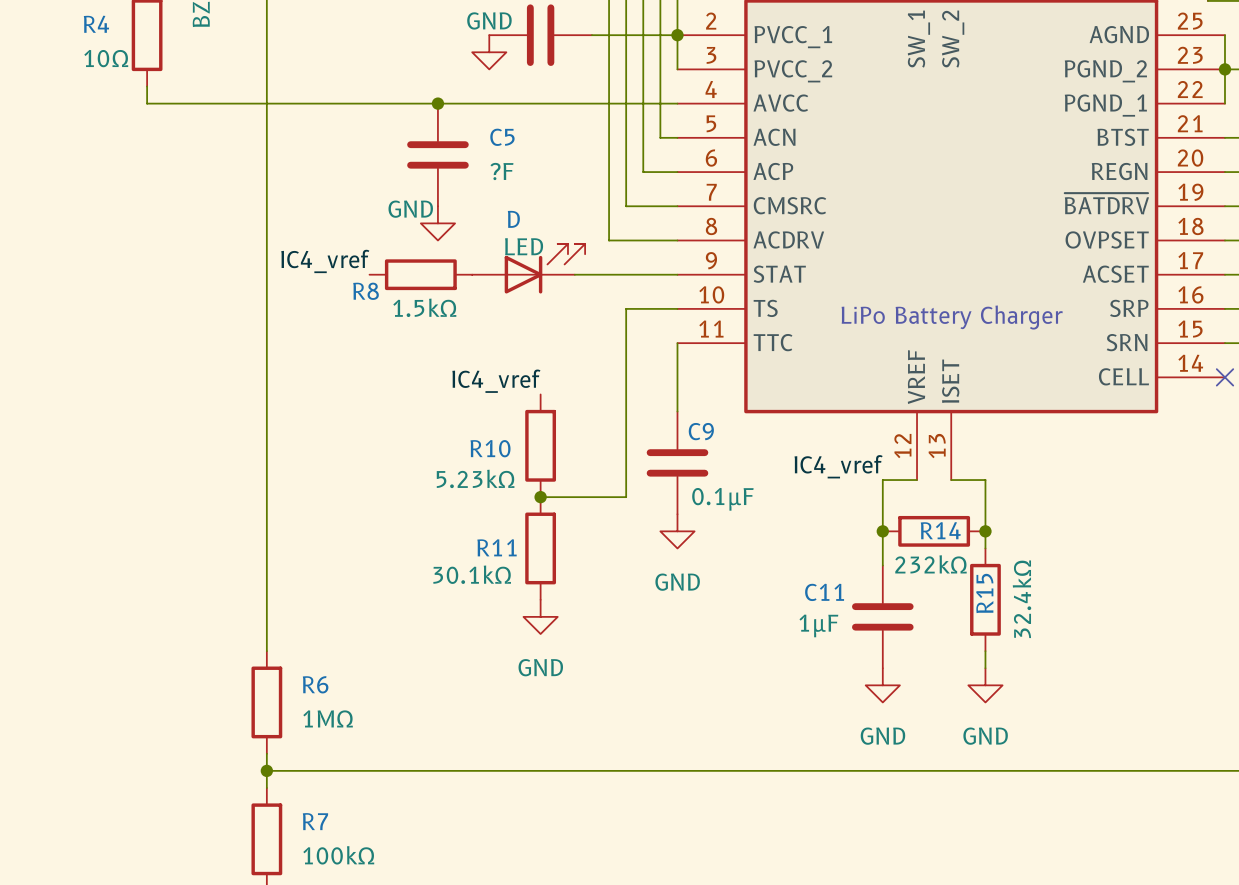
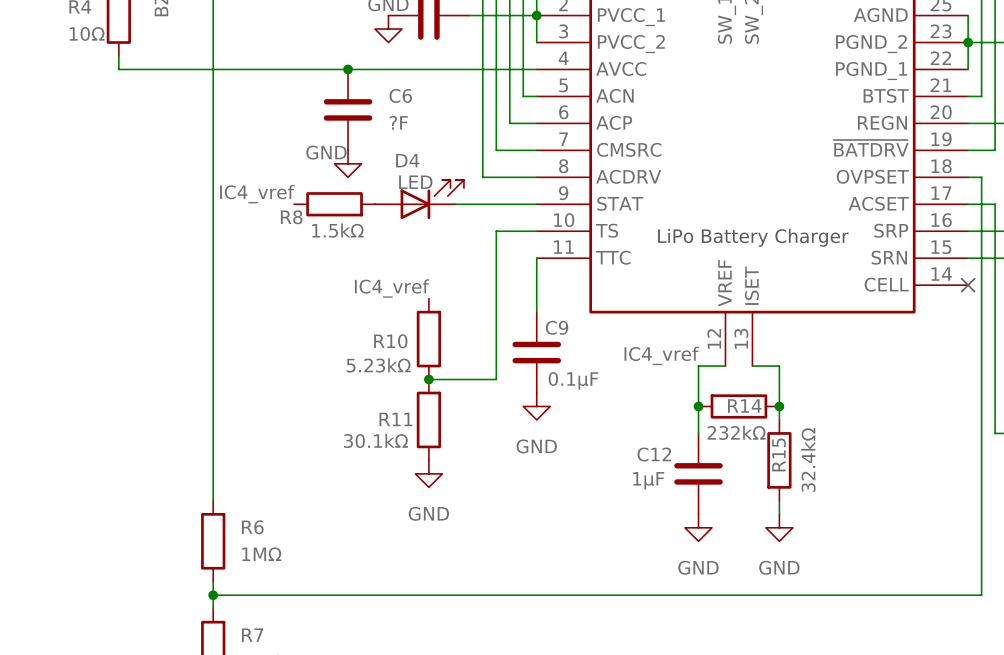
C5 name: C5 (502, 137) -> C6 (400, 95)
D name: D (513, 219) -> D4 (407, 160)
C11 name: C11 (824, 592) -> C12 (654, 454)

